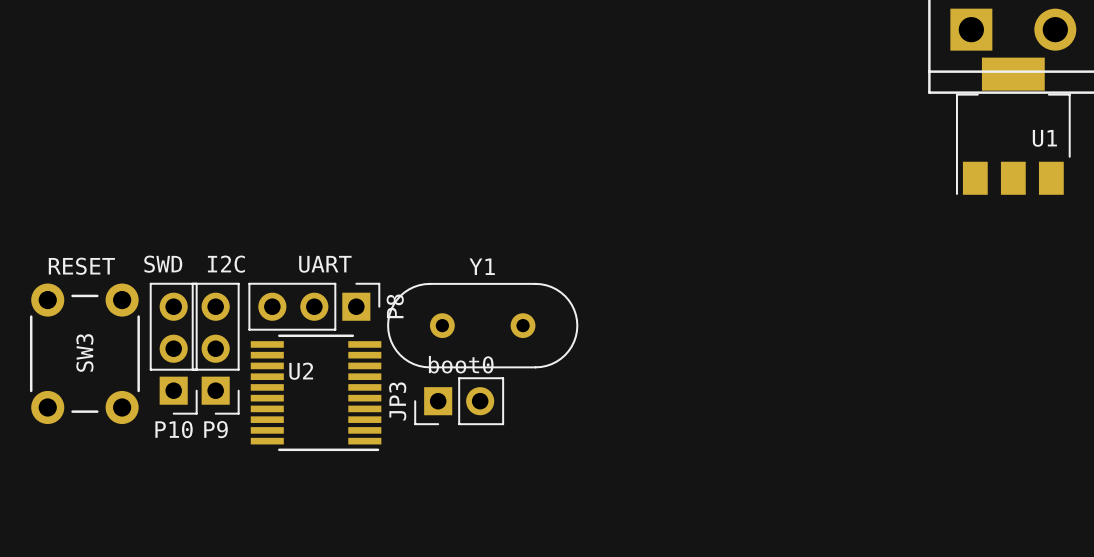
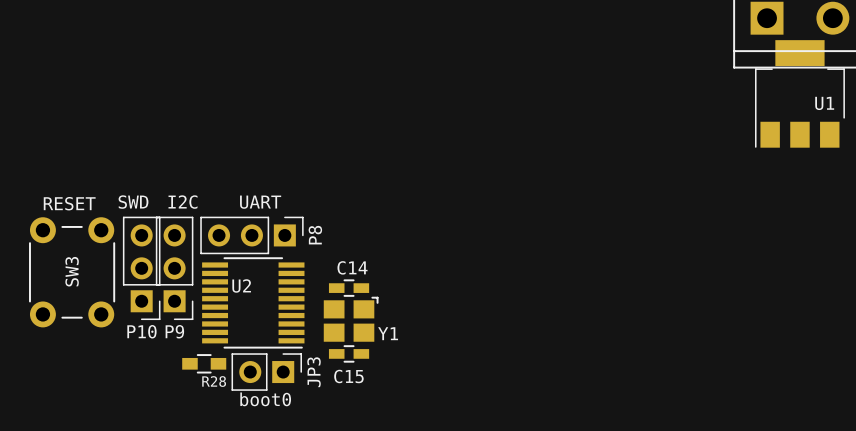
Y1 name position: Y1 (482, 266) -> Y1 (388, 333)
Y1 footprint: [387, 282, 579, 369] -> [323, 296, 379, 342]
C14: none -> (349, 288)
JP3 rotation: 0° (459, 401) -> 180° (266, 372)
JP3 position: (459, 401) -> (266, 372)
C15: none -> (349, 353)
R28: none -> (204, 363)

